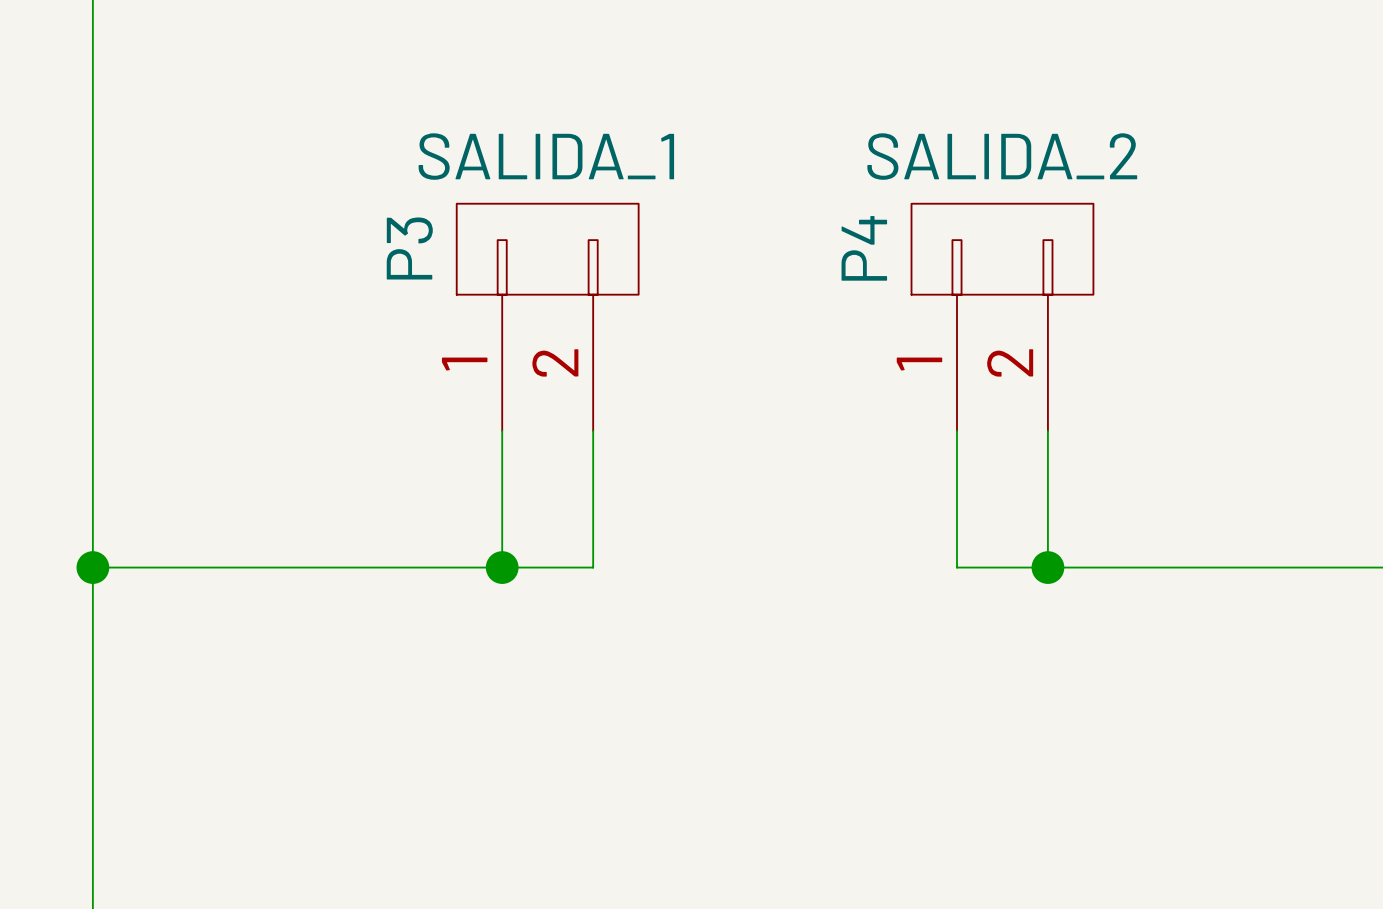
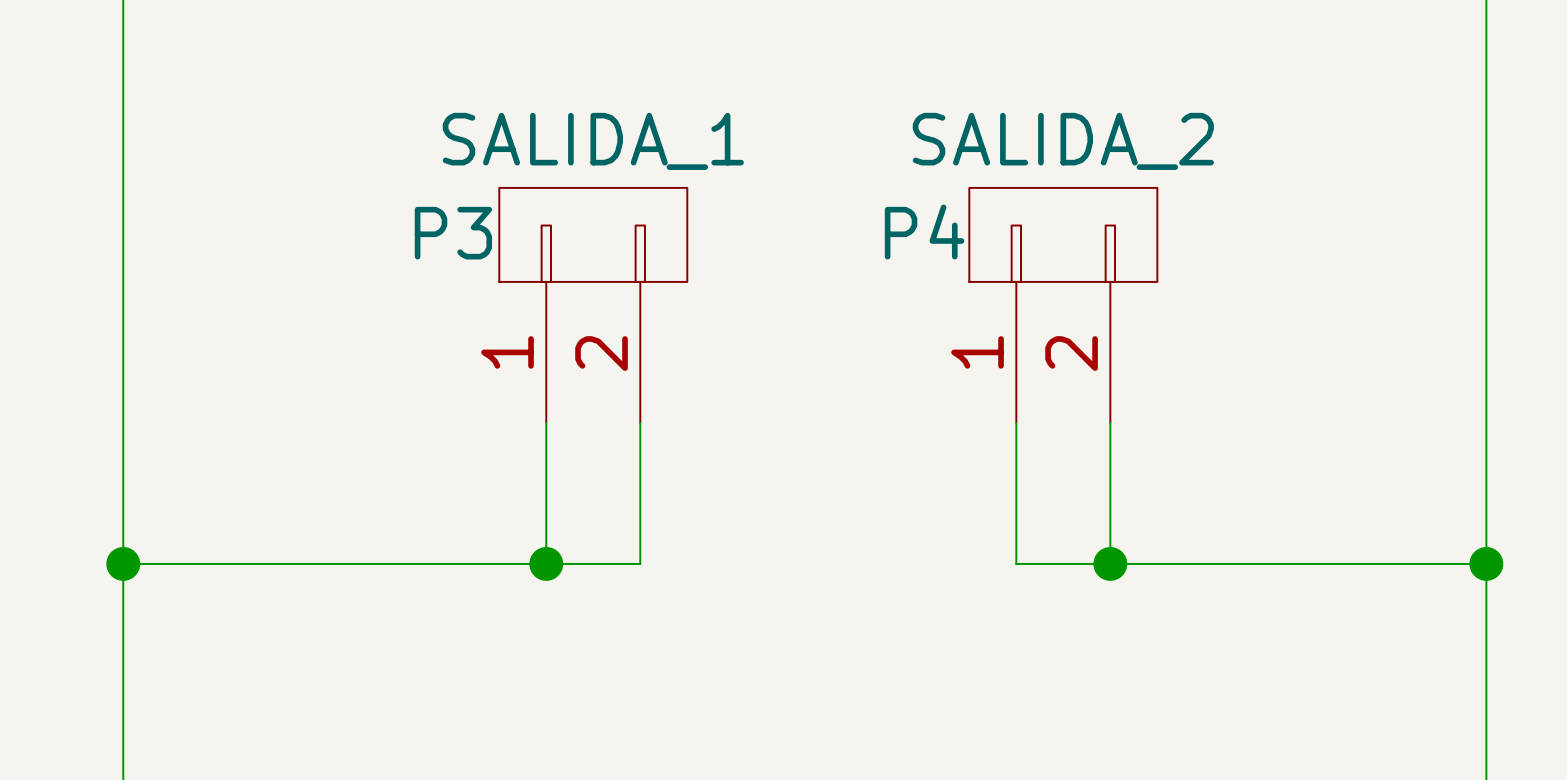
P3 name rotation: 0° (409, 248) -> 90° clockwise (453, 233)
P4 name rotation: 0° (864, 248) -> 90° clockwise (924, 232)

